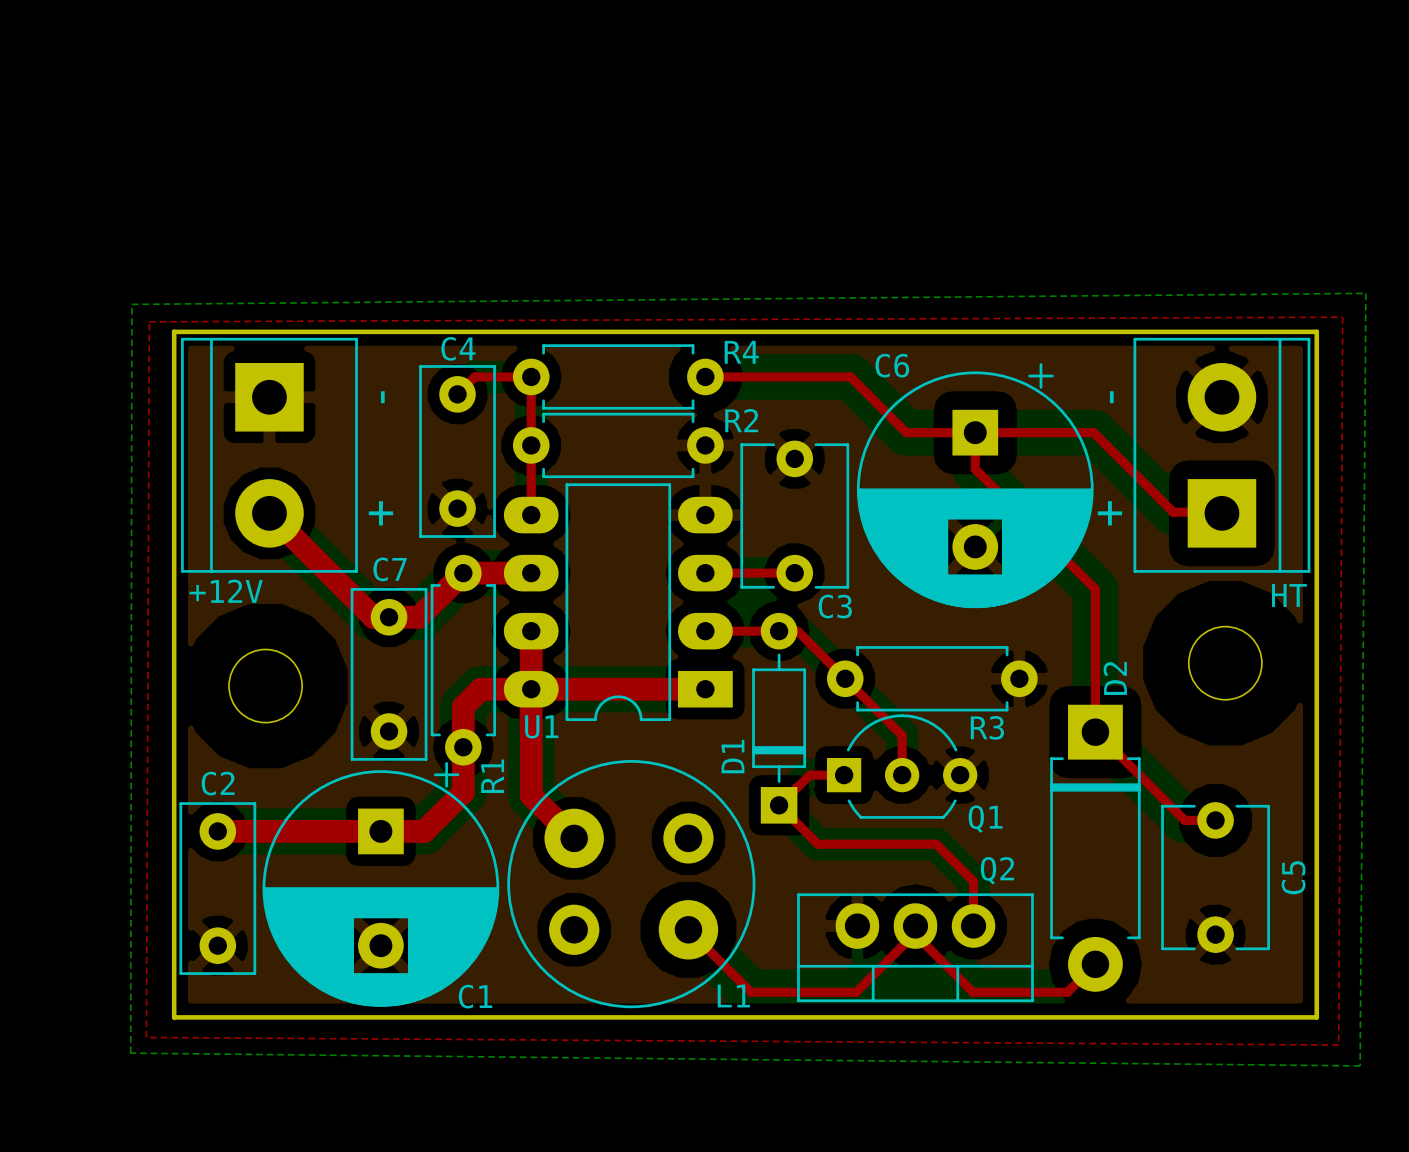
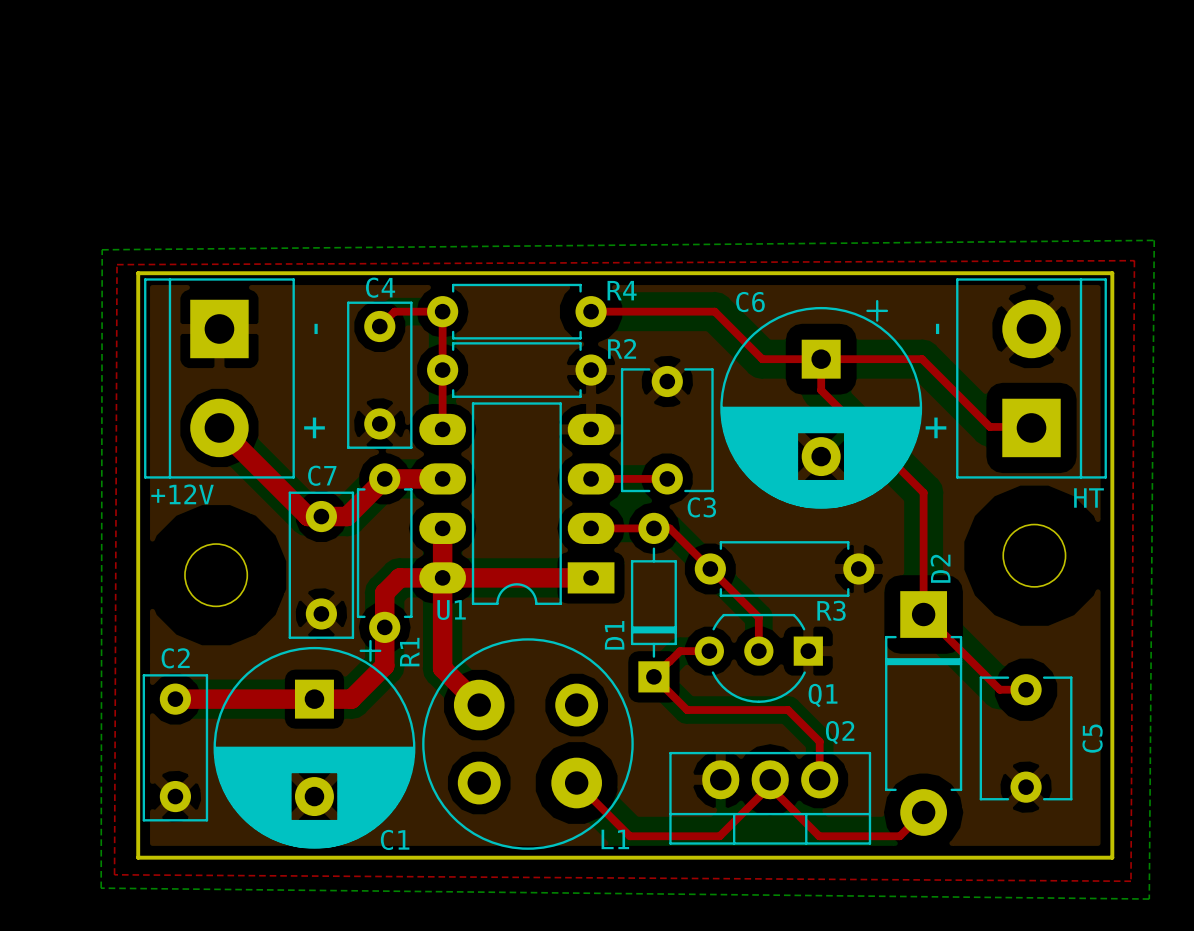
Q1 rotation: 0° (902, 766) -> 180° (758, 658)

